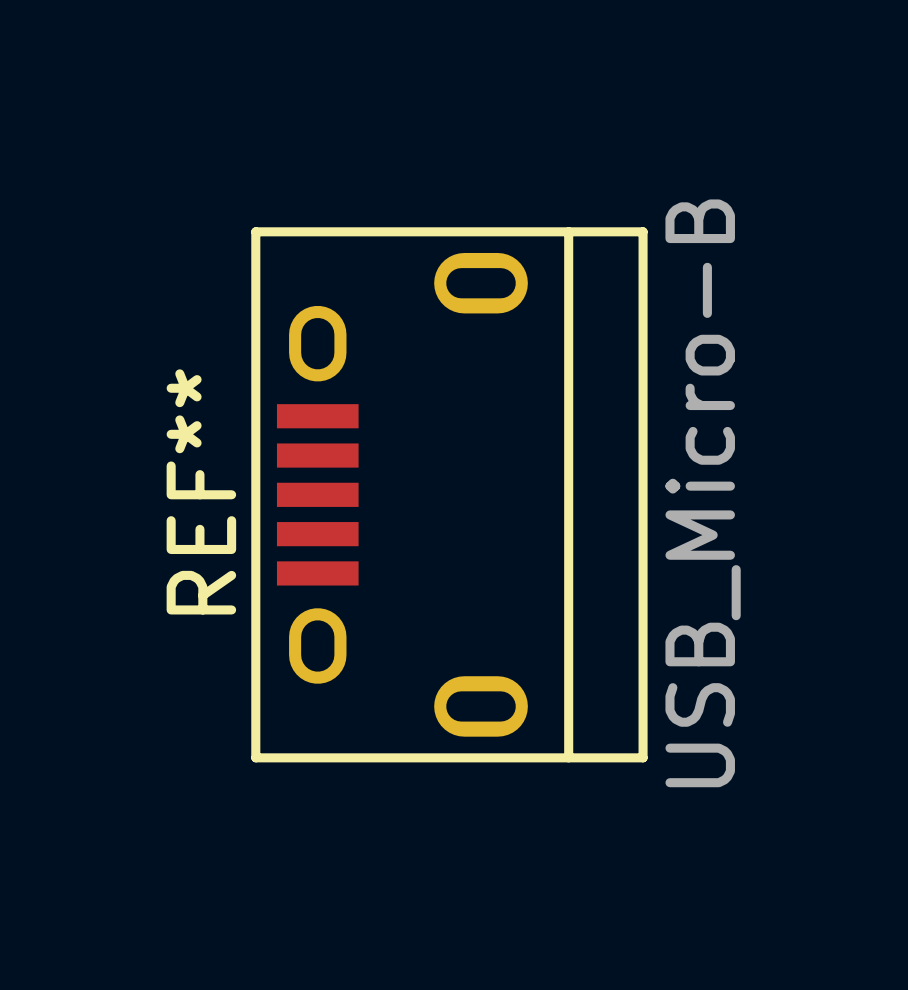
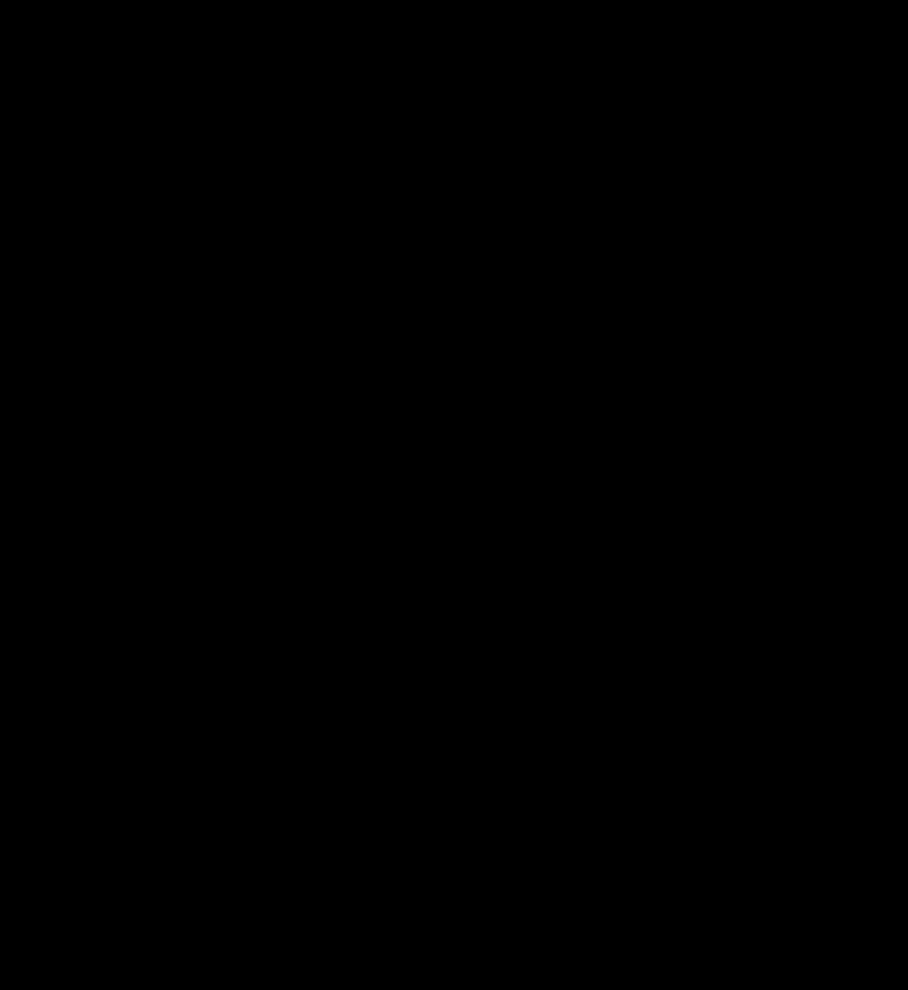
REF**: USB_Micro-B (449, 494) -> none

